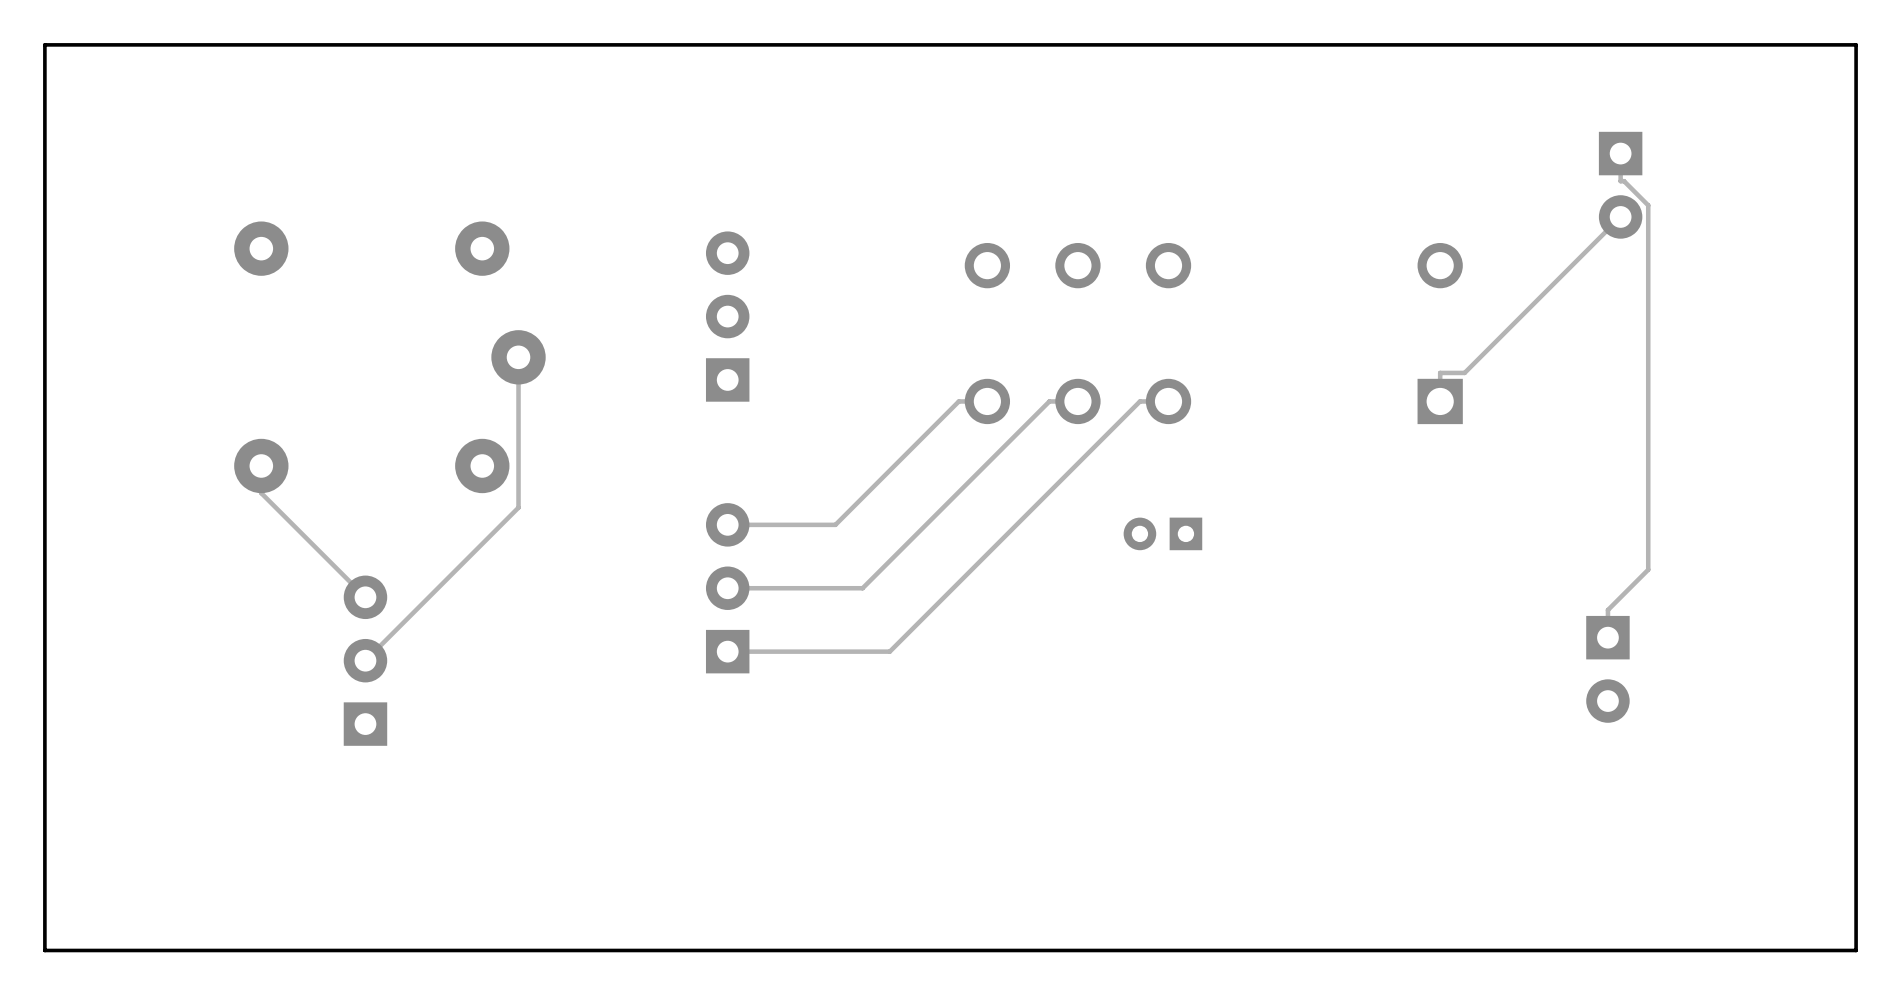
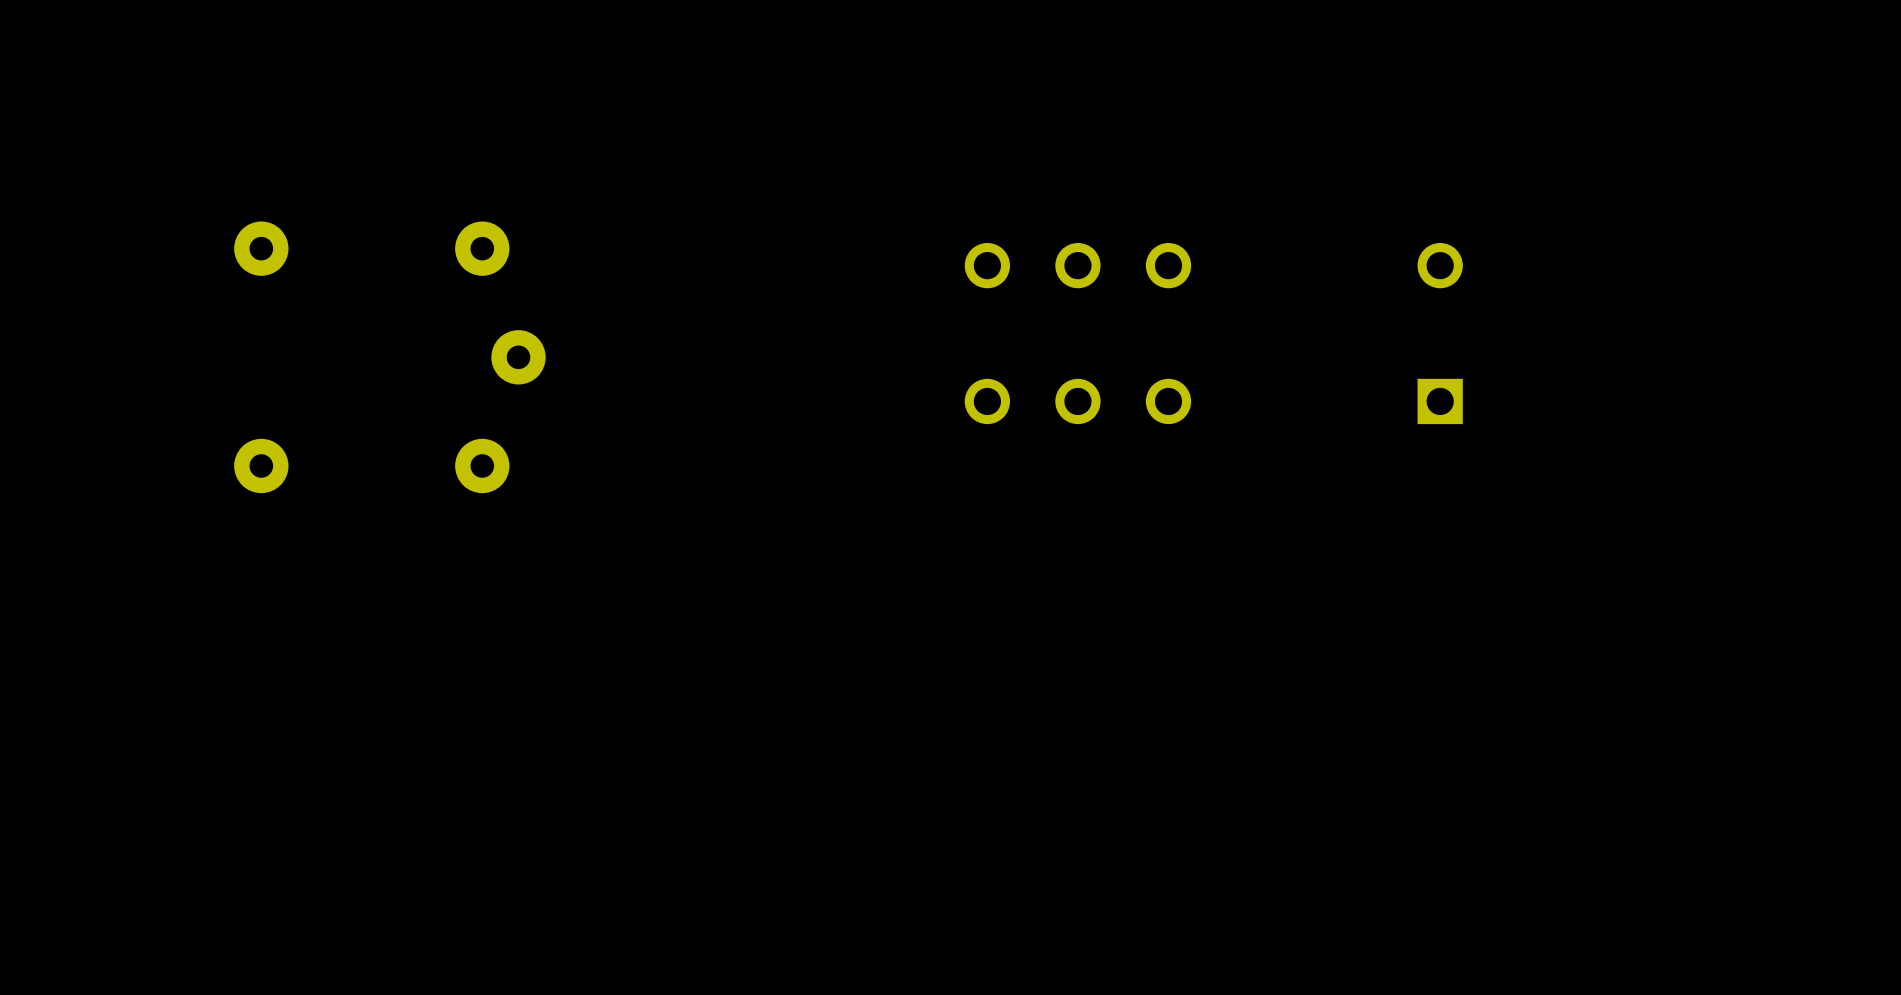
board edge: (1856, 44) (1856, 950) (44, 950) (44, 44) (1856, 44) -> none
track: (1620, 153) (1620, 181) (1624, 181) (1648, 205) (1648, 569) (1607, 610) (1607, 637) -> none
part: (1620, 185) -> none
track: (1620, 216) (1464, 372) (1440, 372) (1440, 401) -> none
part: (727, 316) -> none
track: (518, 357) (518, 507) (365, 660) -> none
track: (987, 401) (958, 401) (835, 524) (727, 524) -> none
track: (1077, 401) (1049, 401) (862, 588) (727, 588) -> none
track: (1168, 401) (1139, 401) (889, 651) (727, 651) -> none
track: (261, 465) (261, 493) (365, 597) -> none
part: (1162, 533) -> none
part: (727, 588) -> none
part: (365, 660) -> none
part: (1607, 669) -> none

